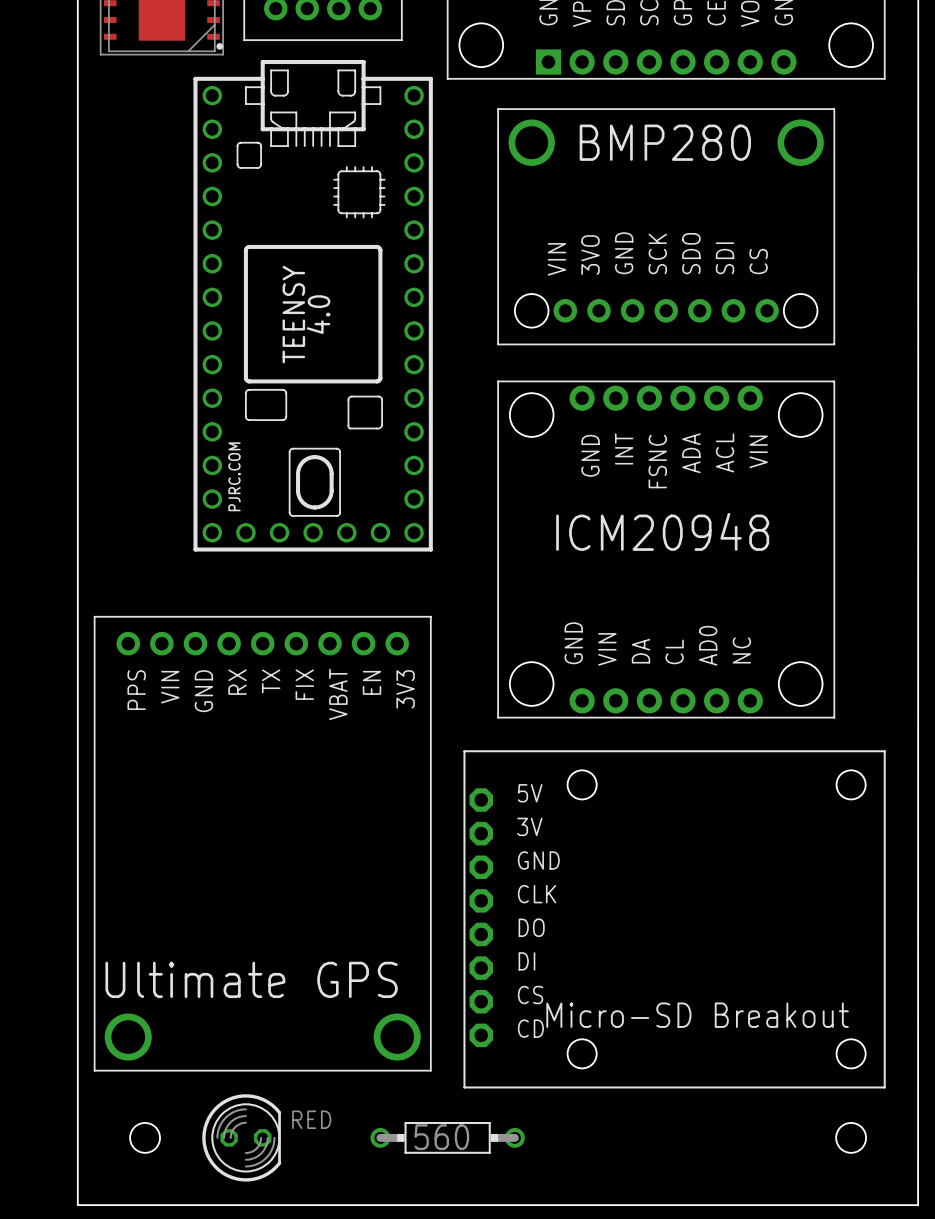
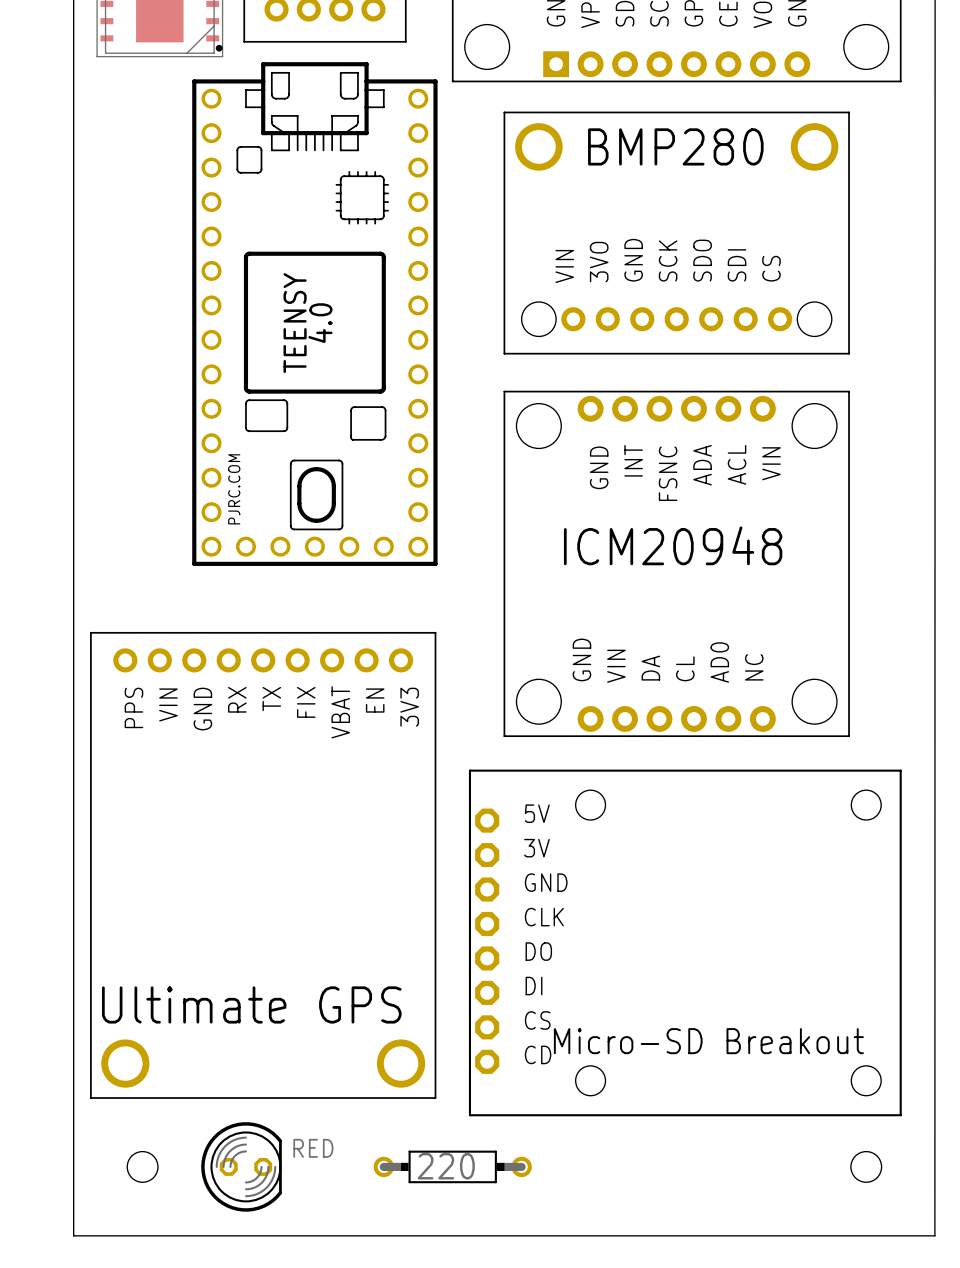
part value: 560 (441, 1137) -> 220 (446, 1166)

